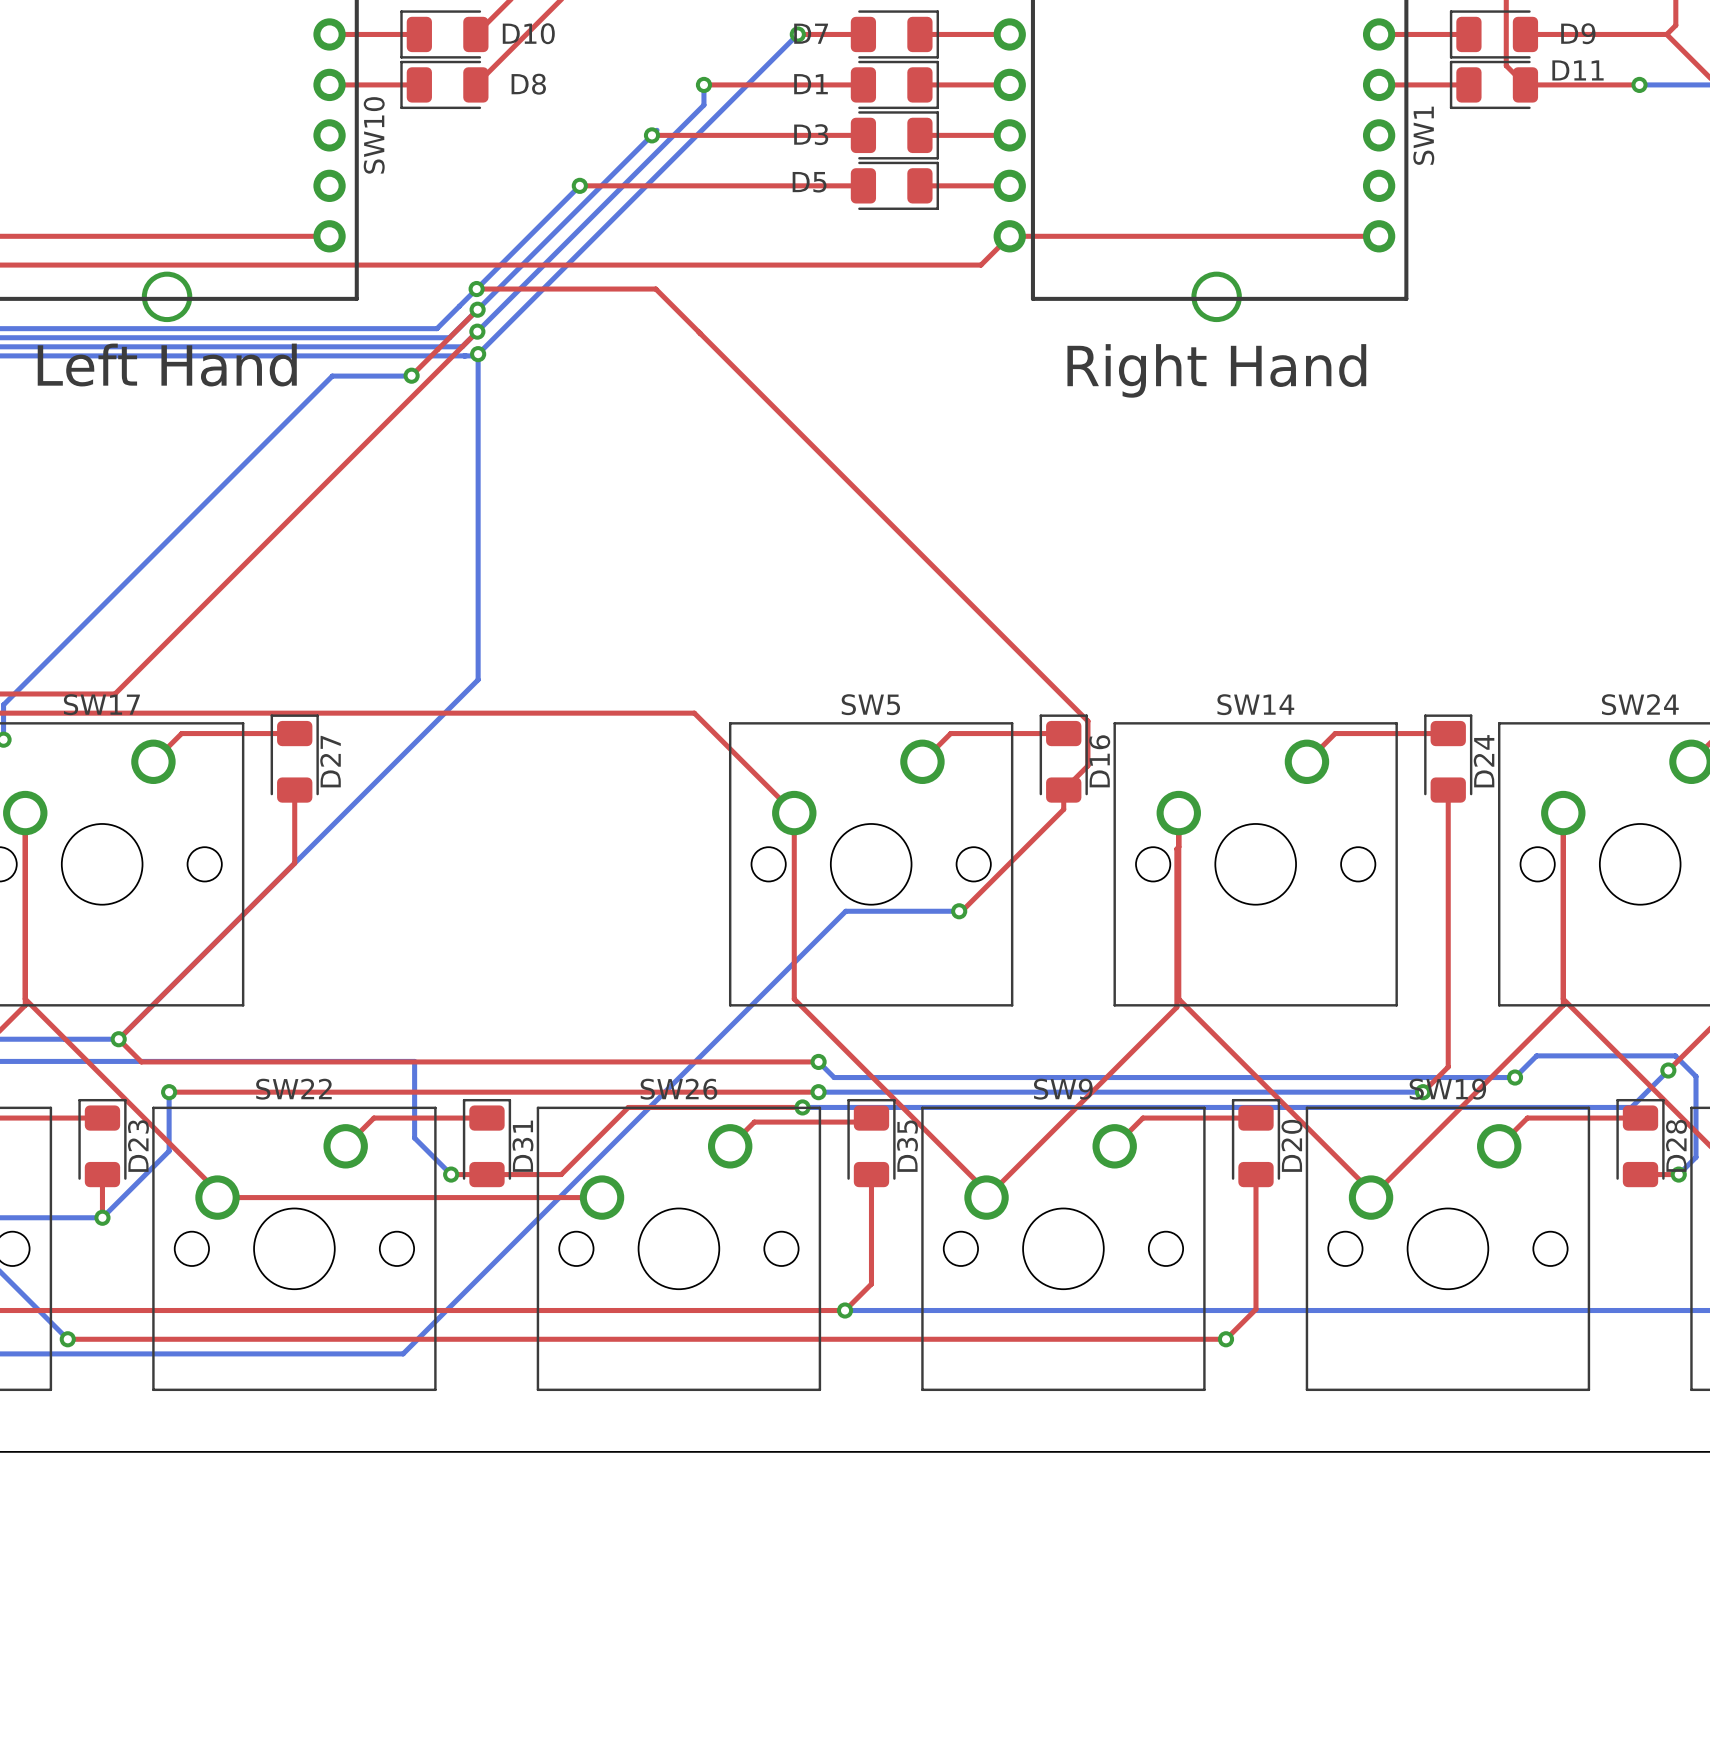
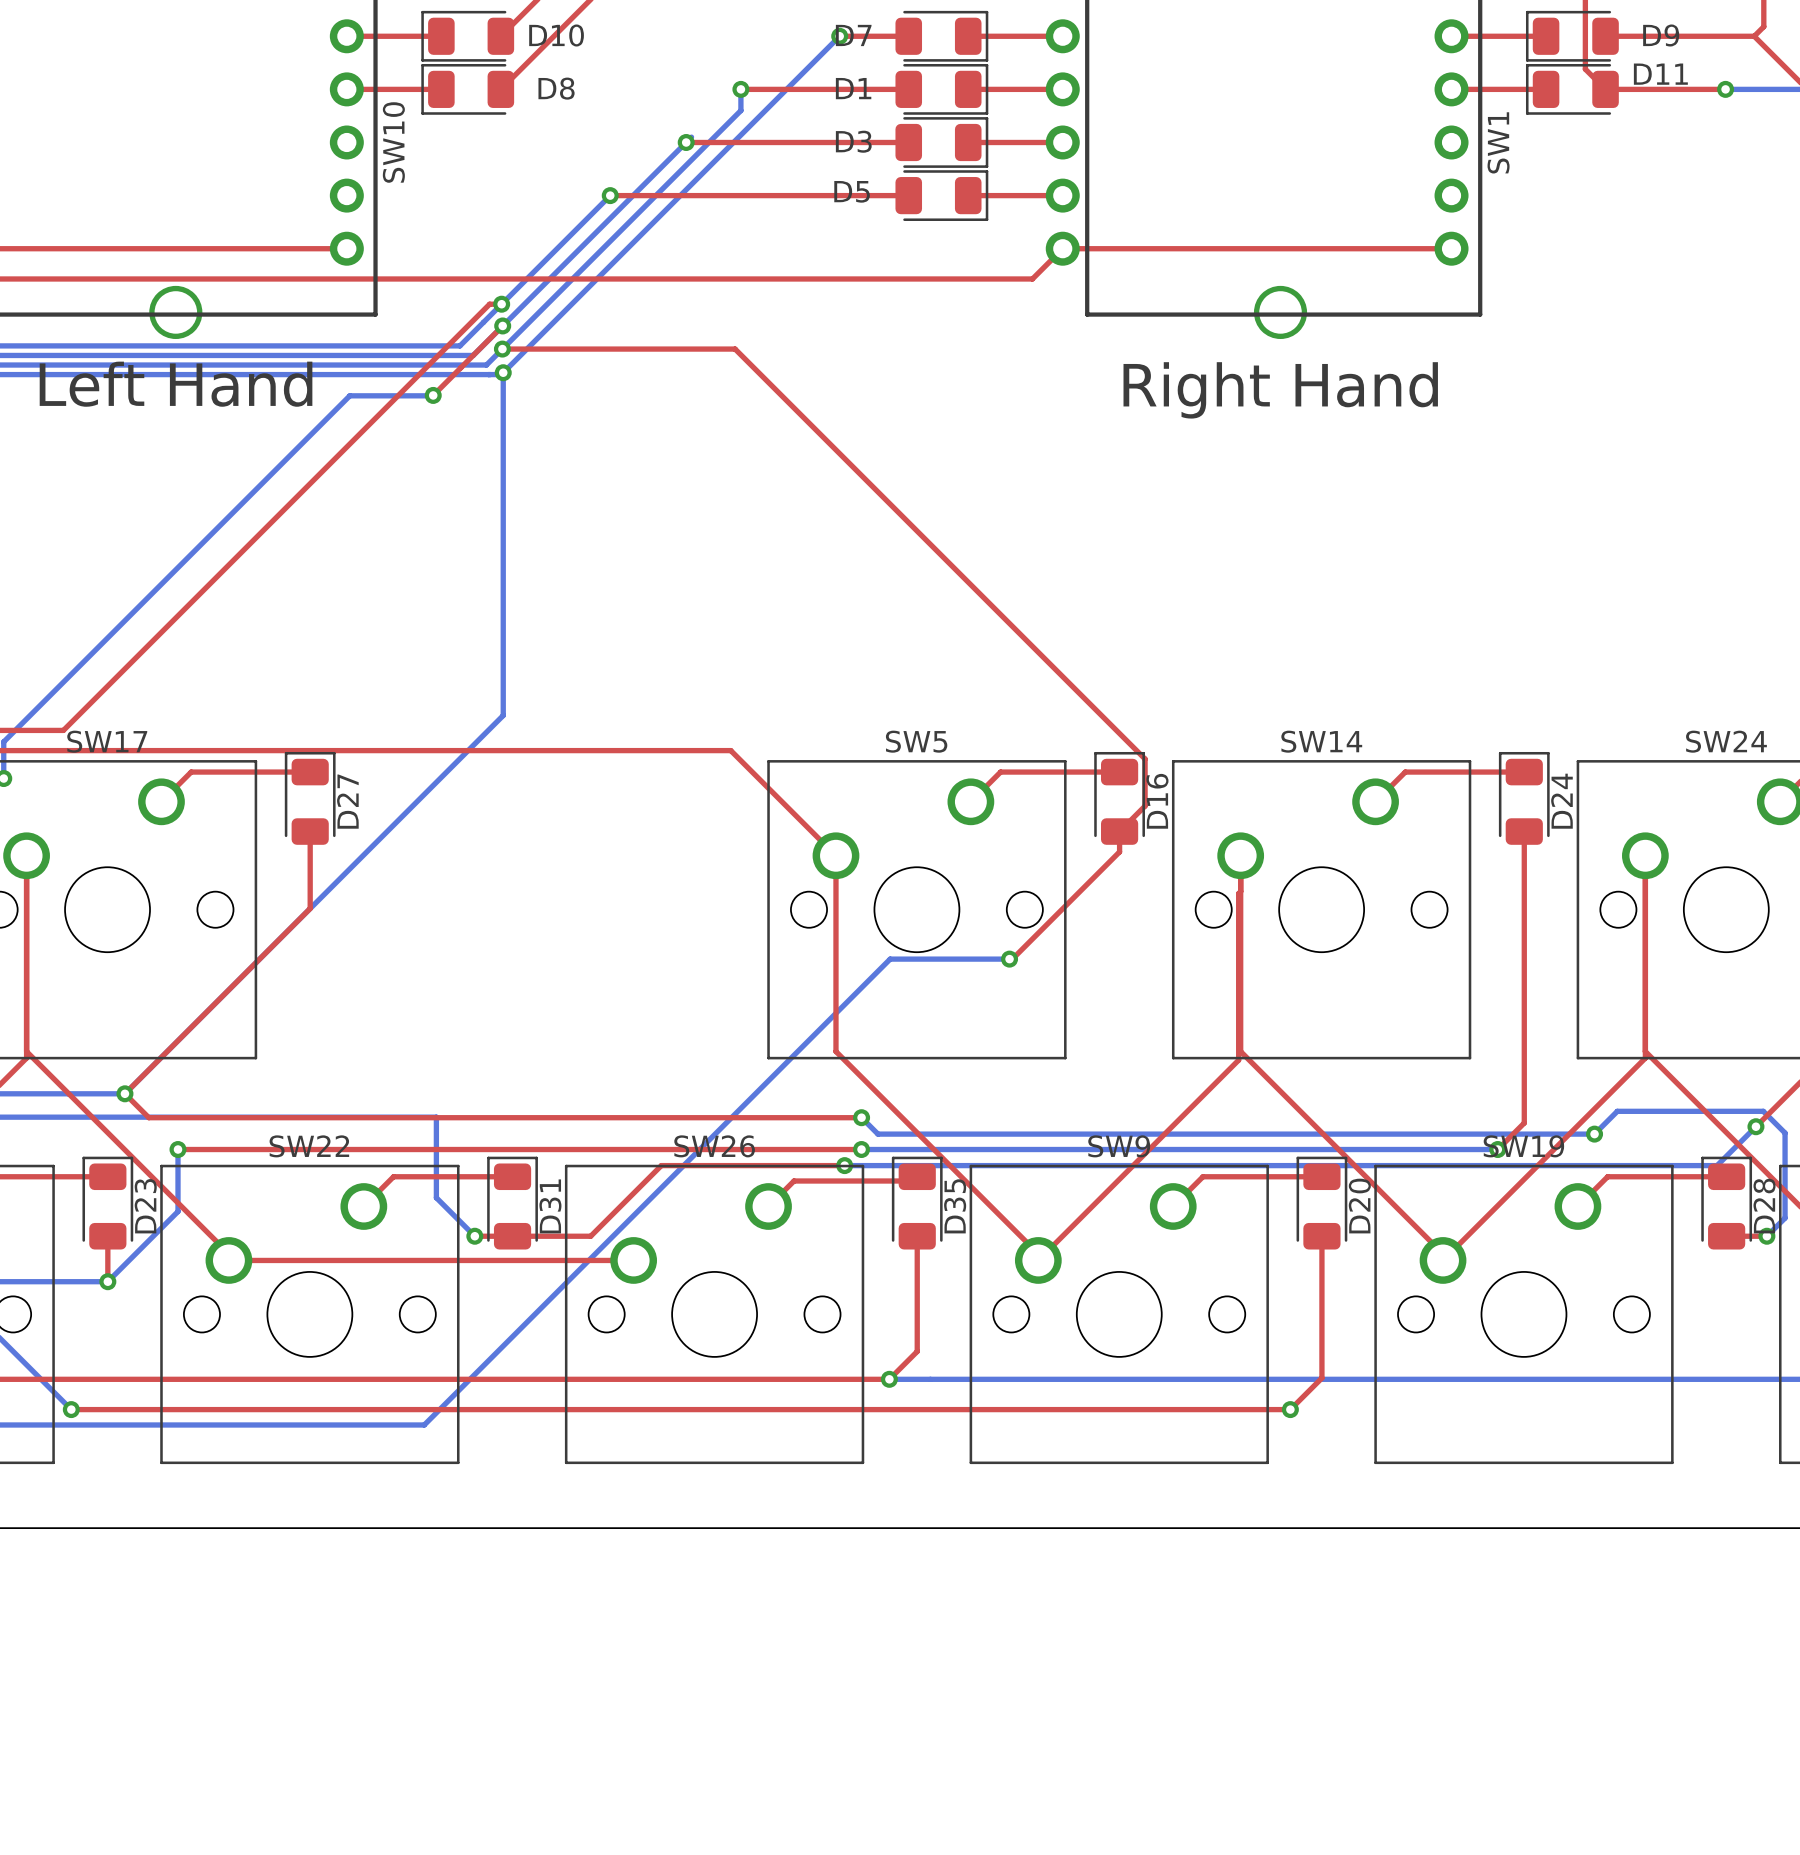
top track: (476, 289) (655, 289) (698, 331) -> (502, 349) (735, 349)
top track: (477, 331) (115, 693) (60, 693) -> (501, 304) (489, 304) (63, 730)

